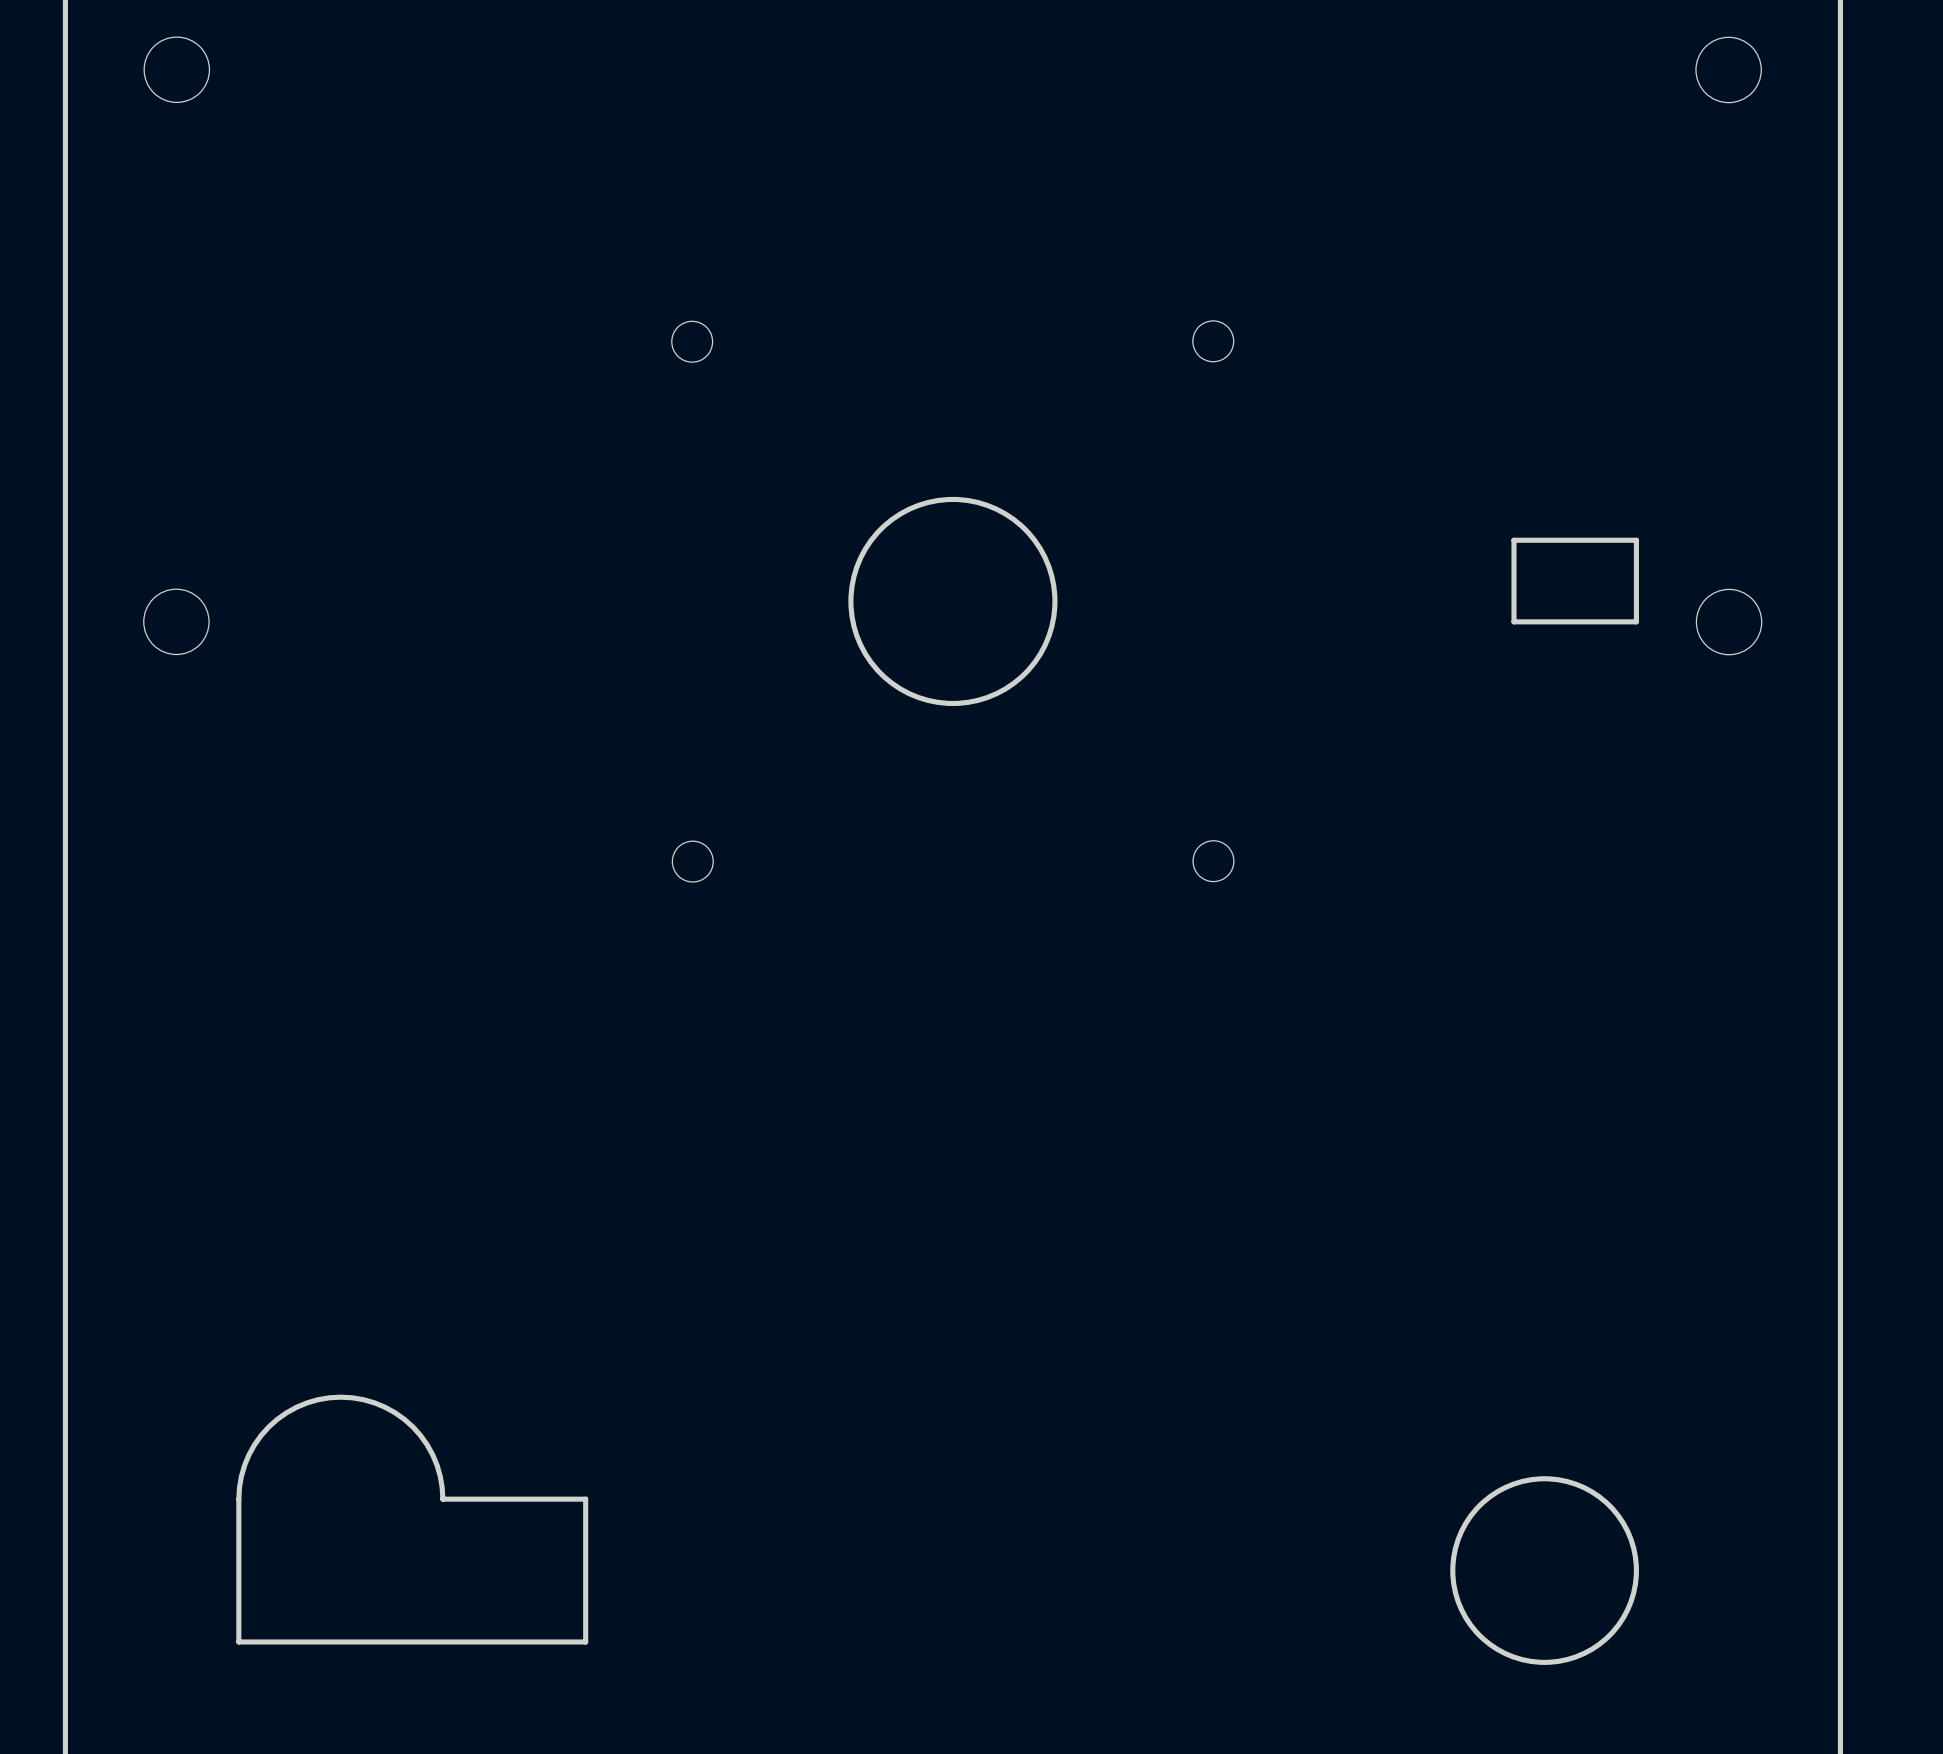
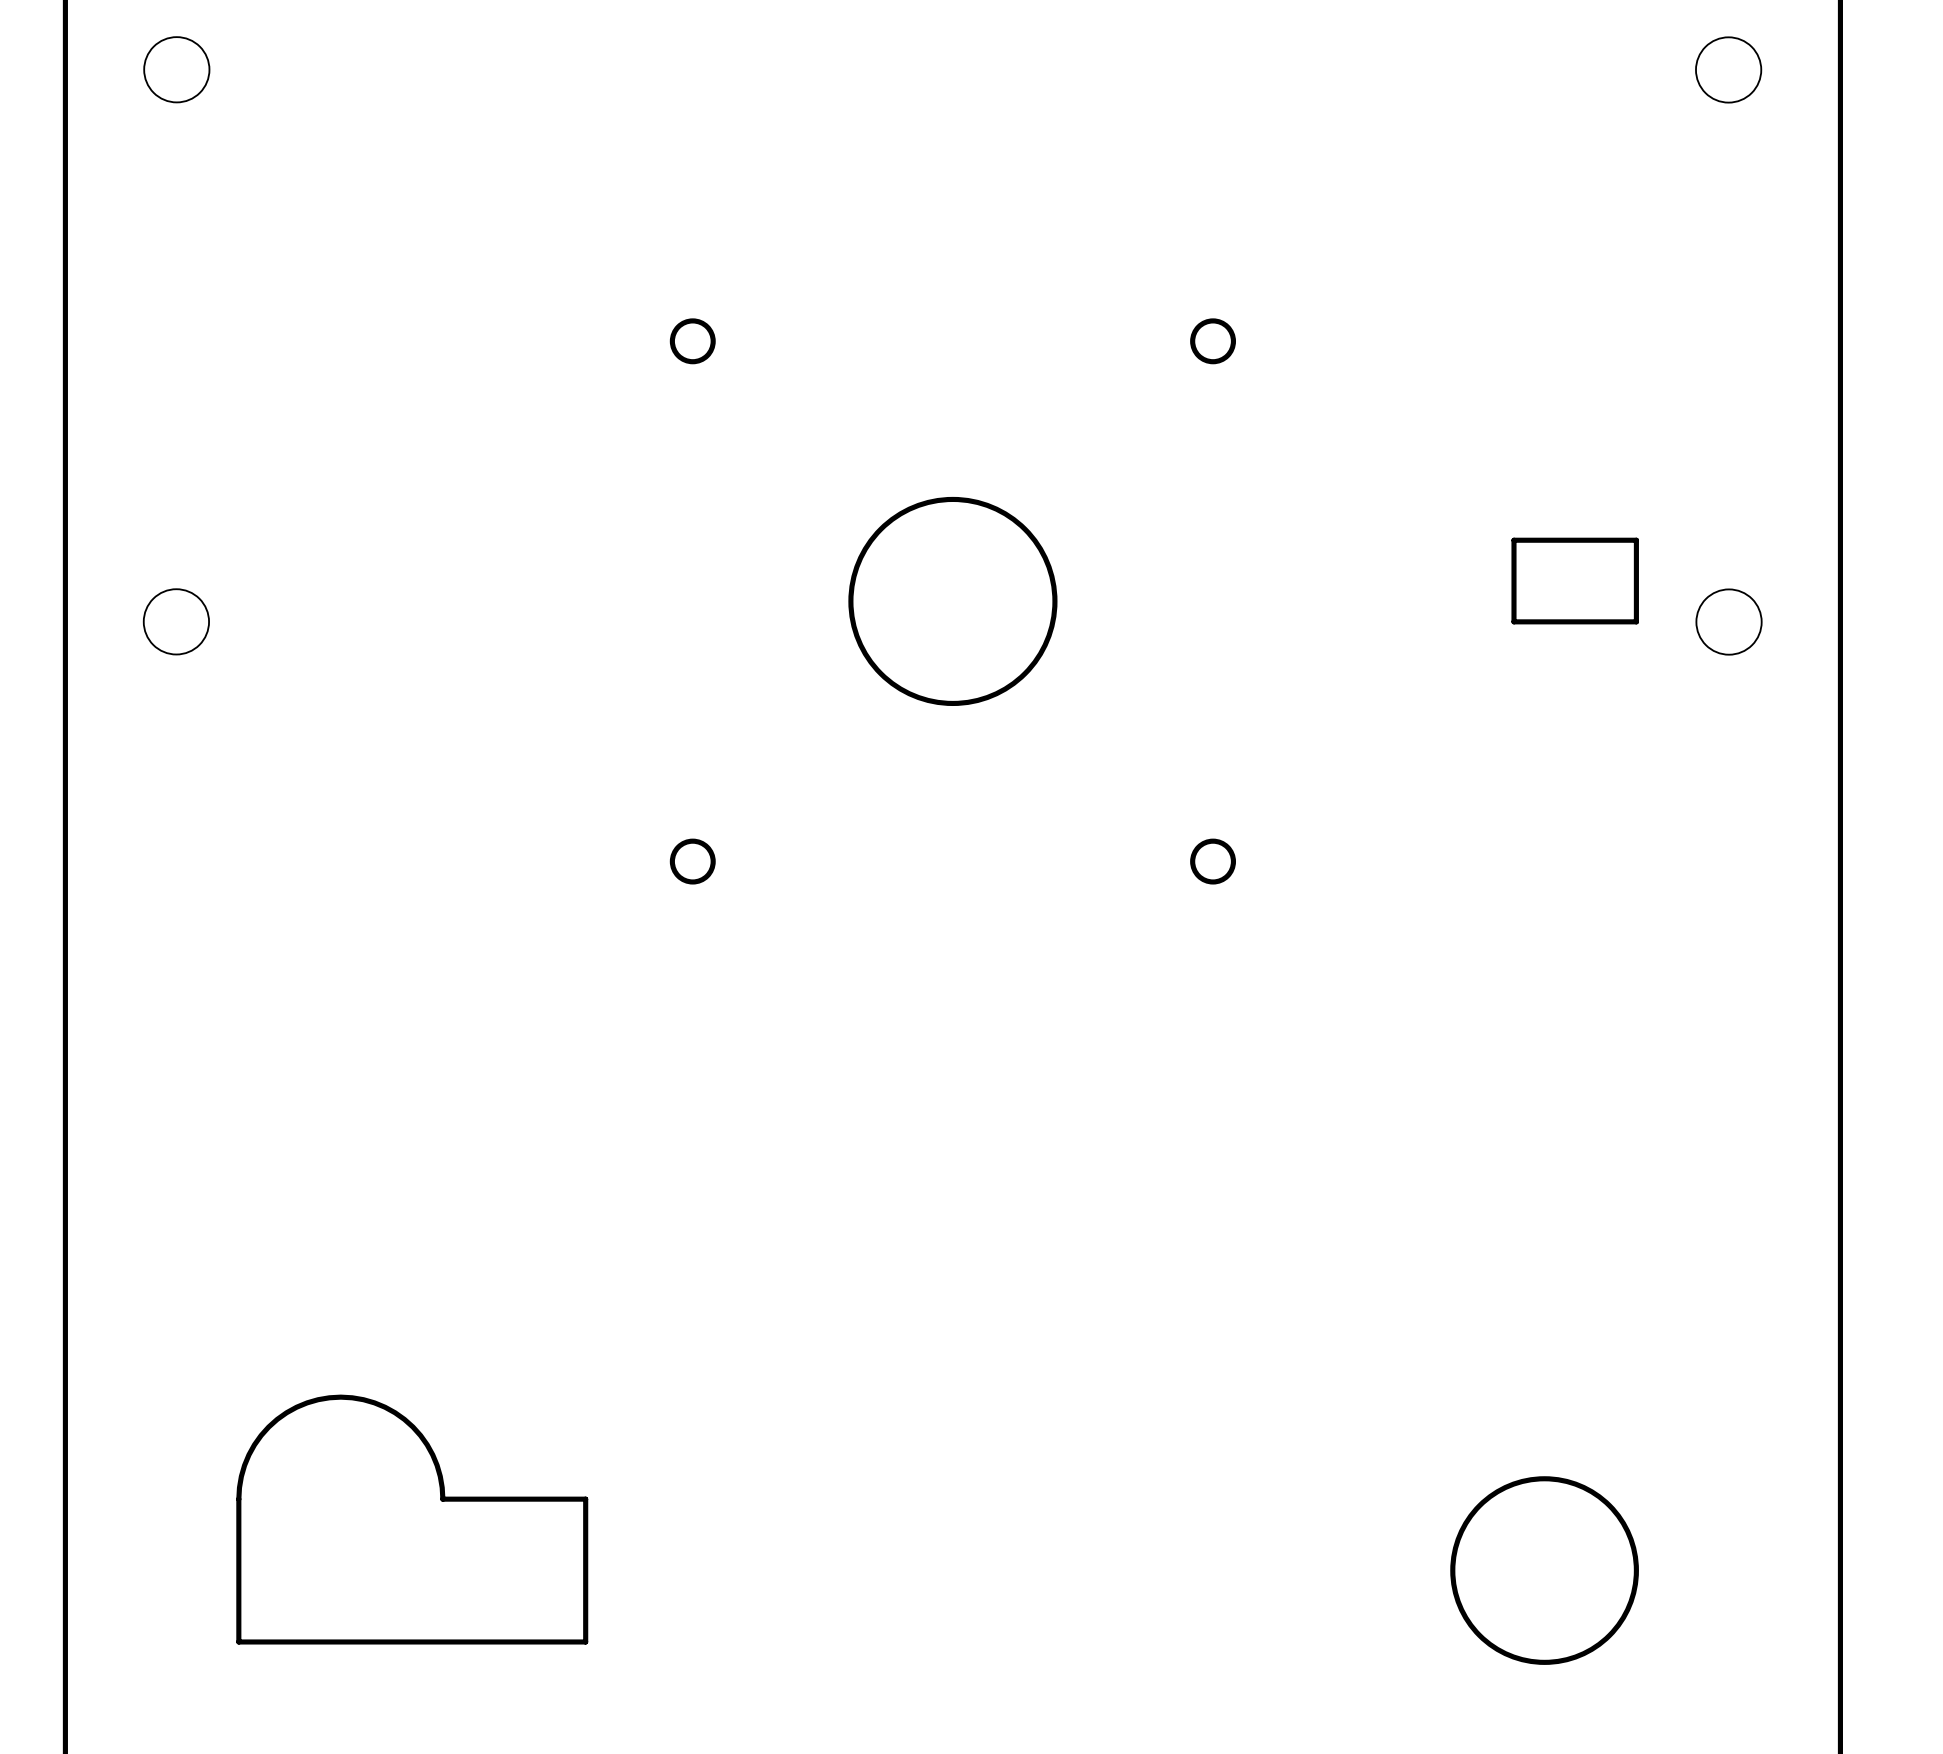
round board edge: none -> [669, 318, 716, 365]
round board edge: none -> [1190, 318, 1237, 365]
round board edge: none -> [669, 838, 716, 885]
round board edge: none -> [1190, 838, 1237, 885]

